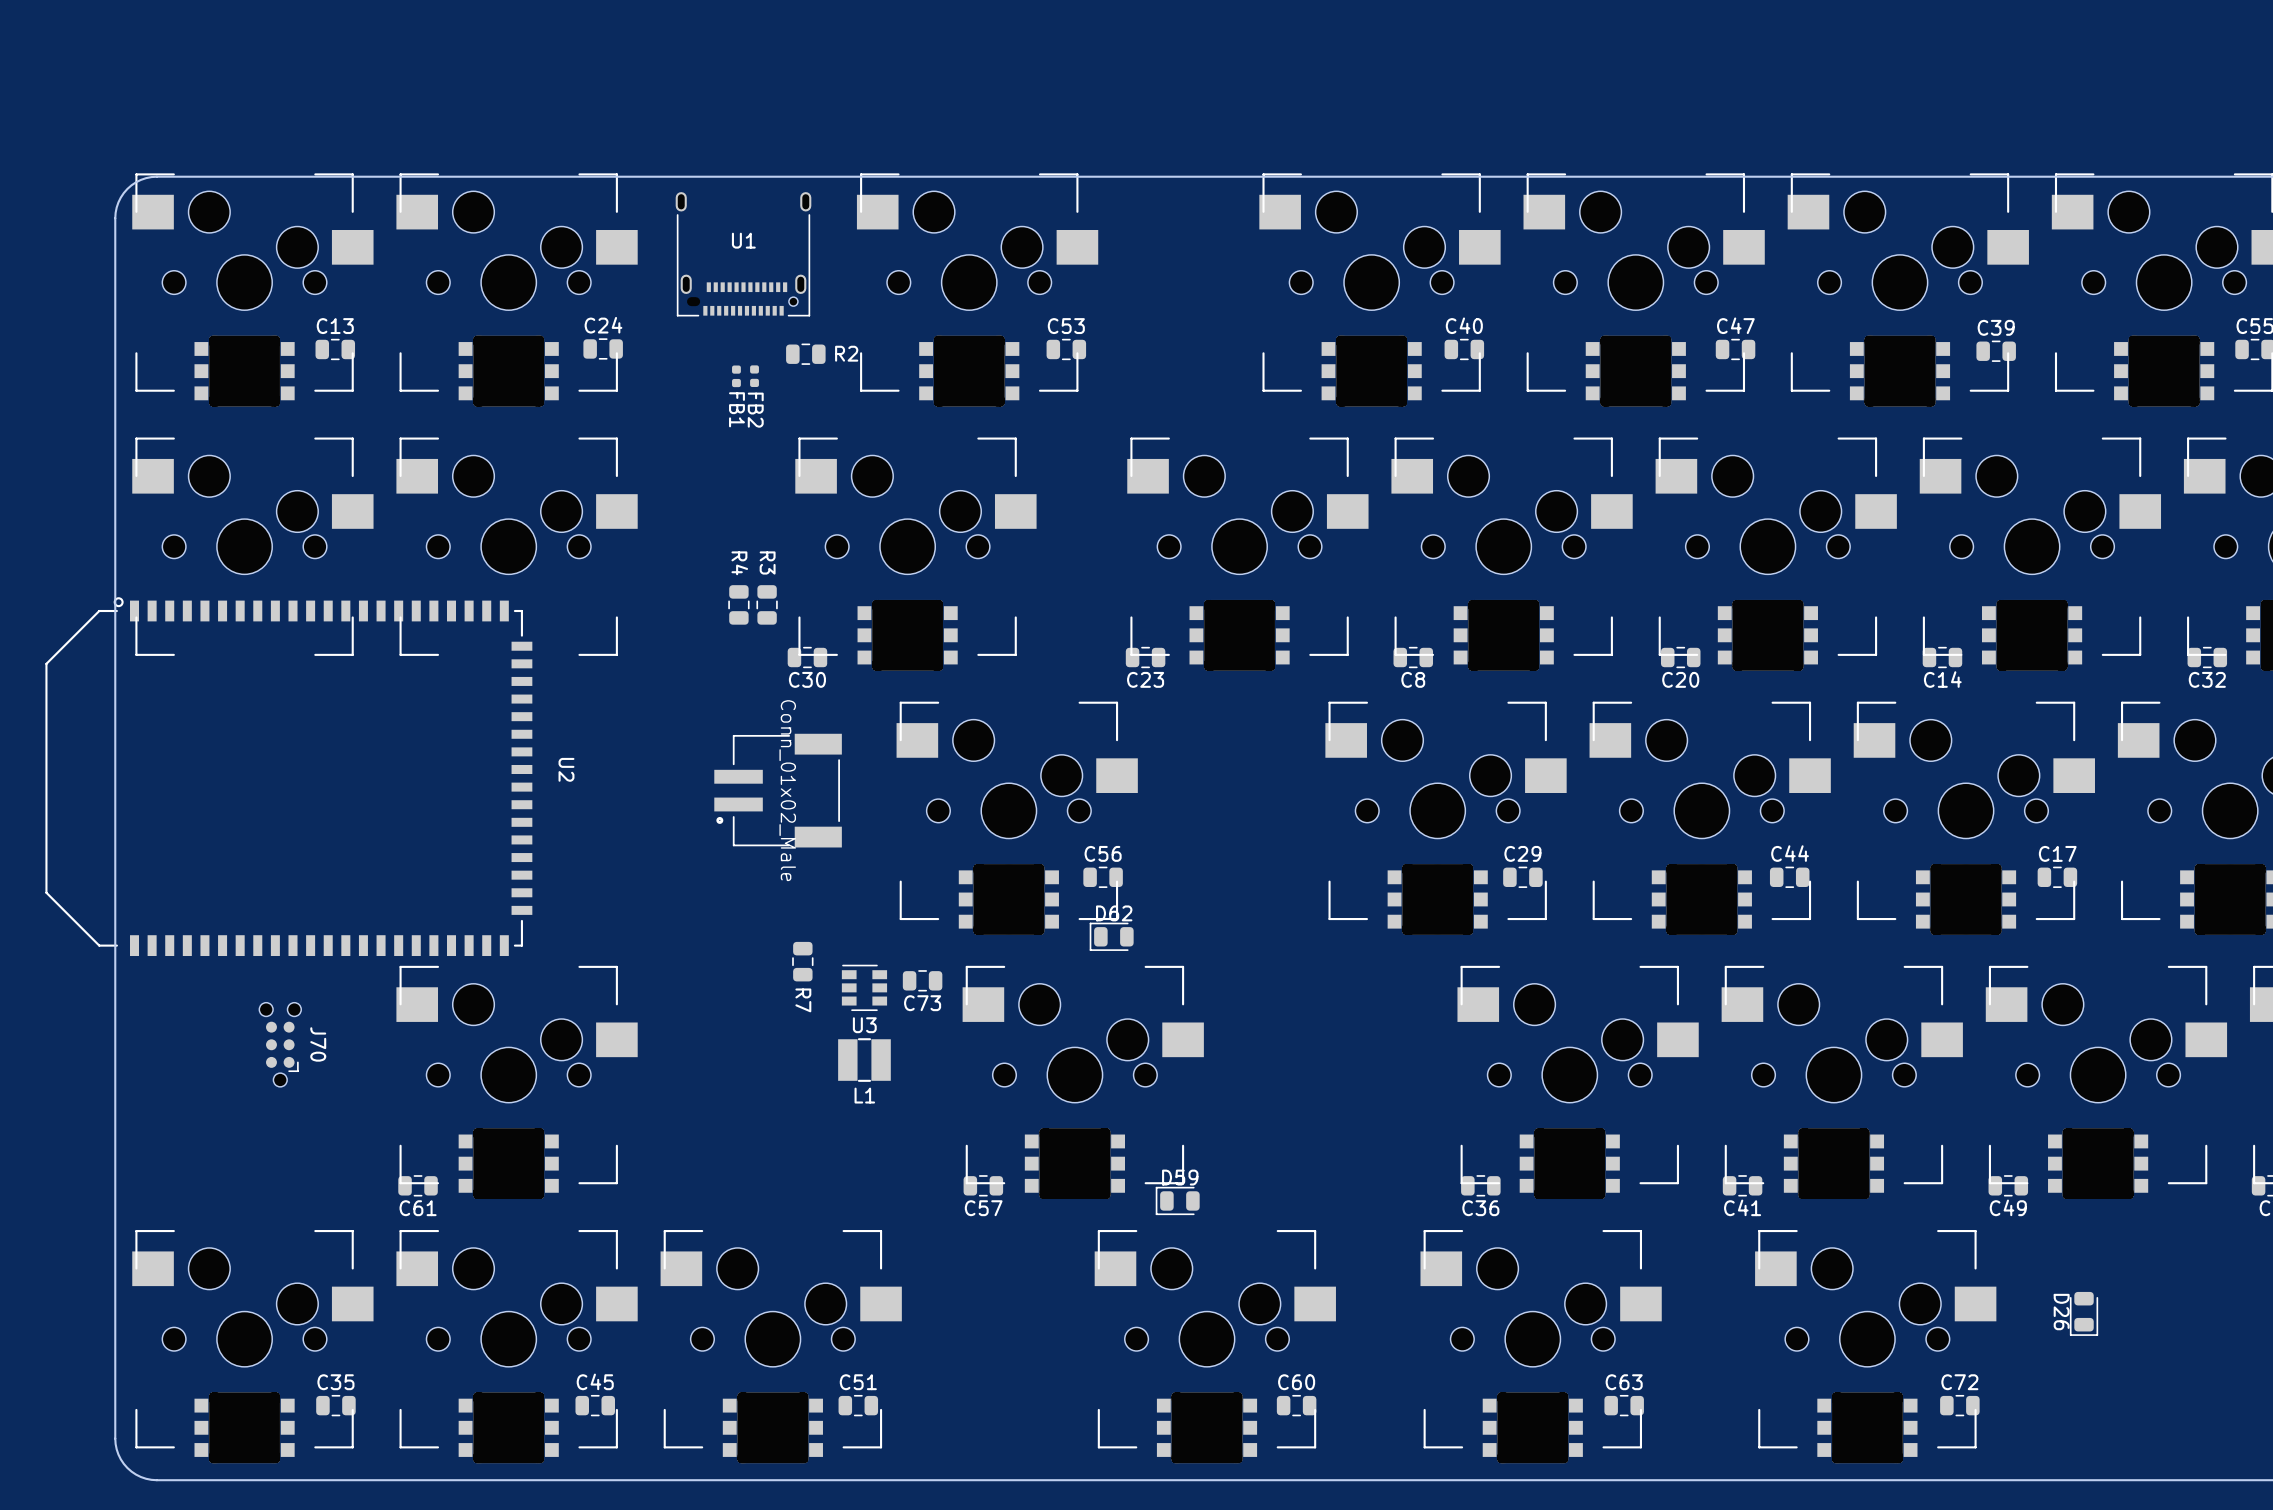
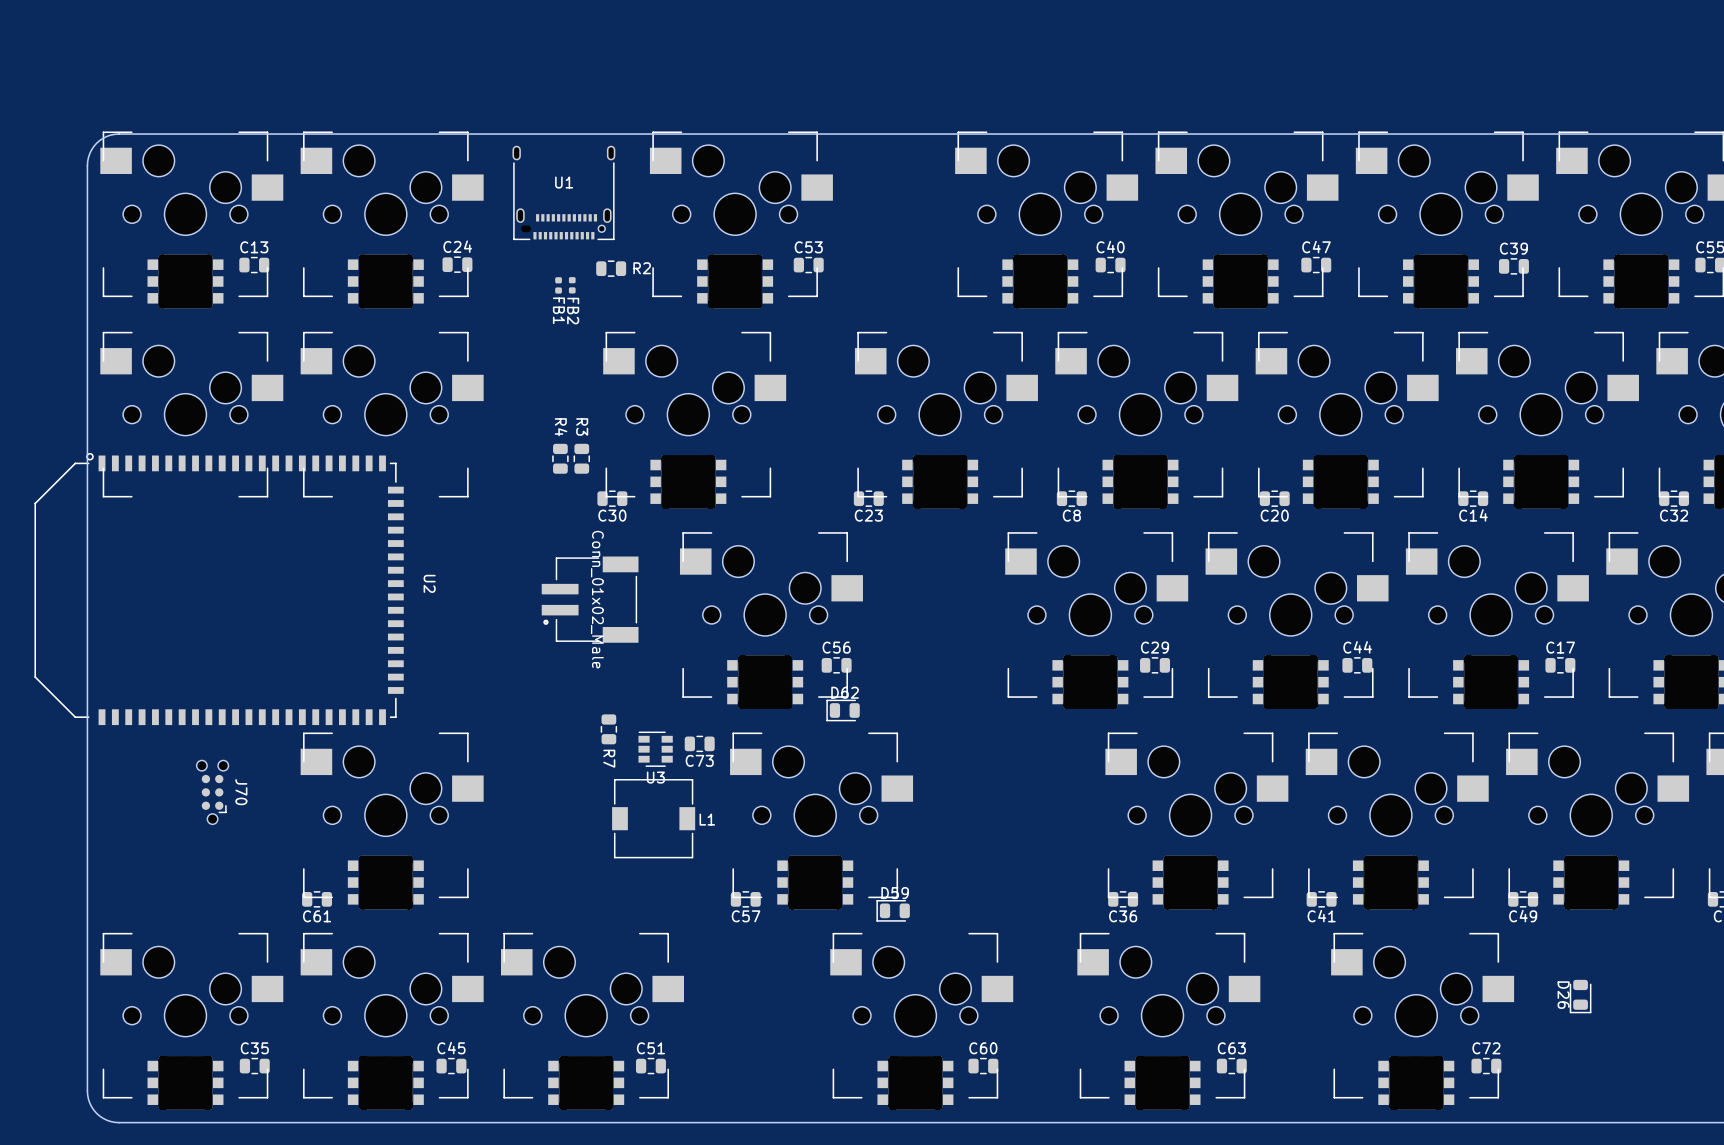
L1 footprint: [838, 1038, 891, 1082] -> [612, 779, 696, 859]
L1 name position: L1 (864, 1095) -> L1 (707, 819)

